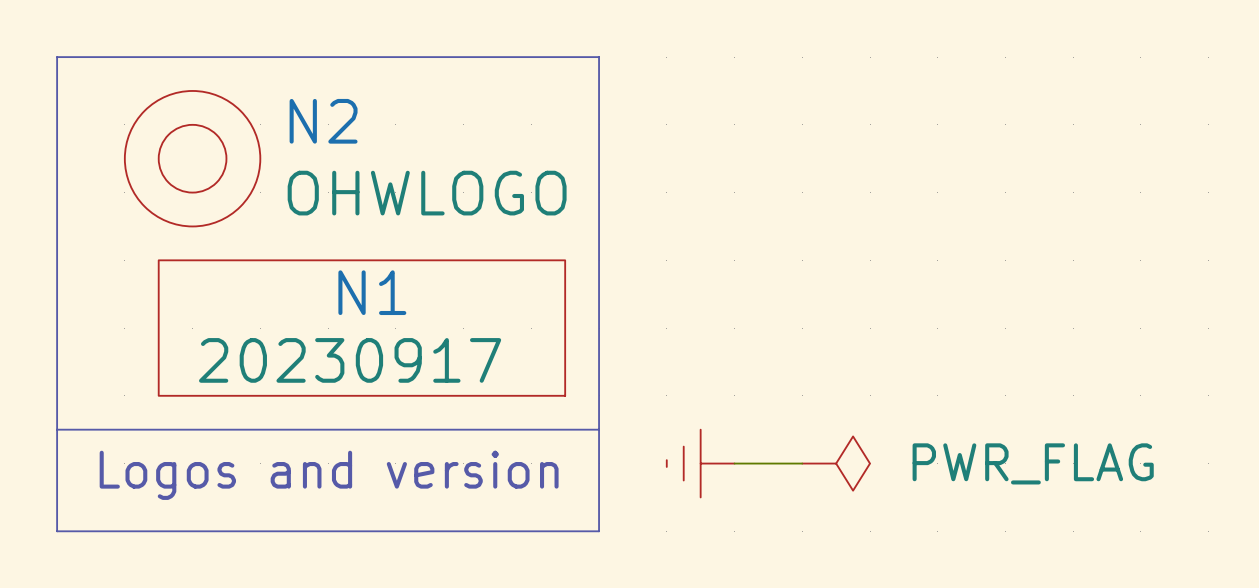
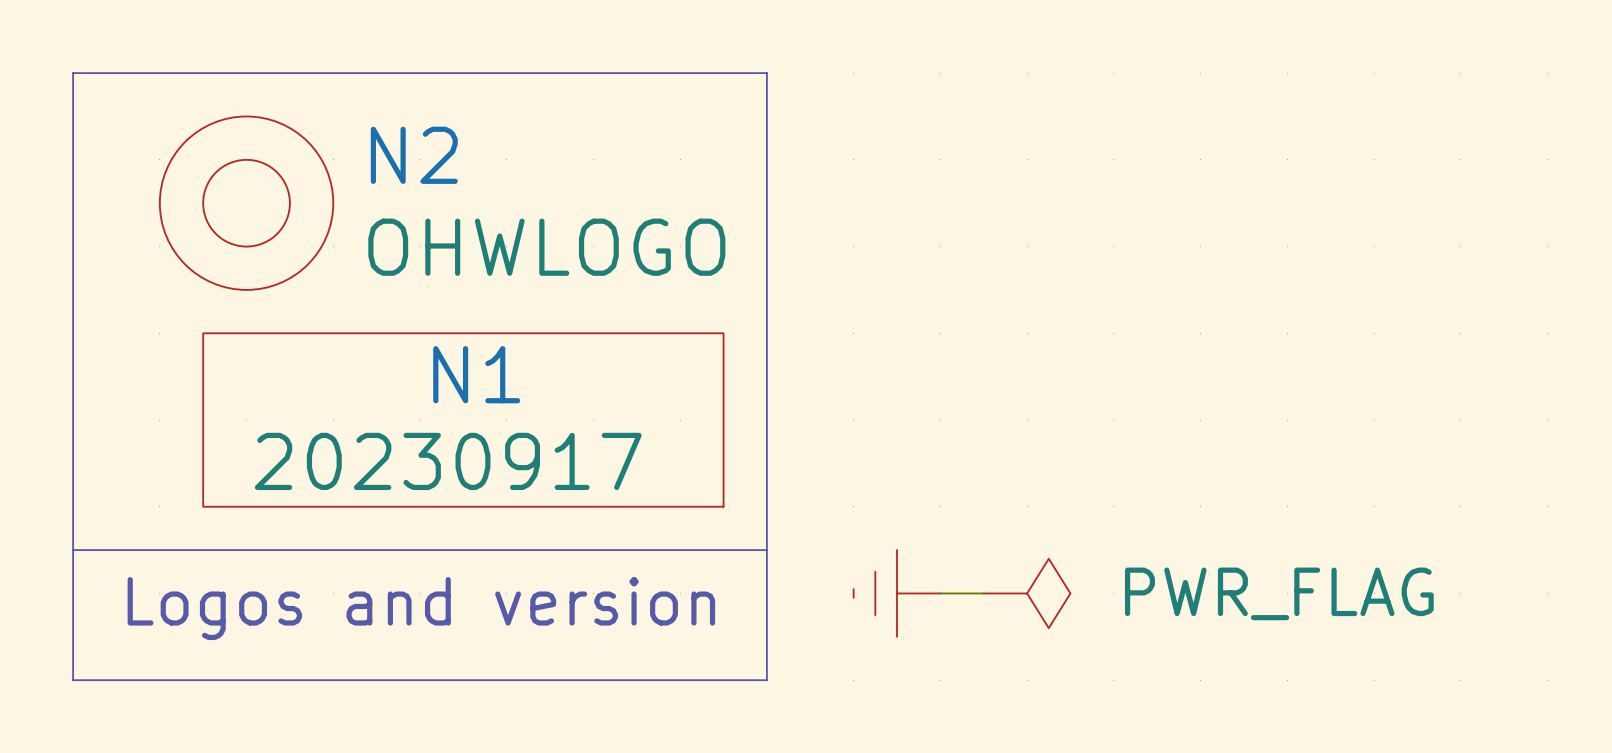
power symbol position: PWR_FLAG (836, 463) -> PWR_FLAG (1027, 593)

